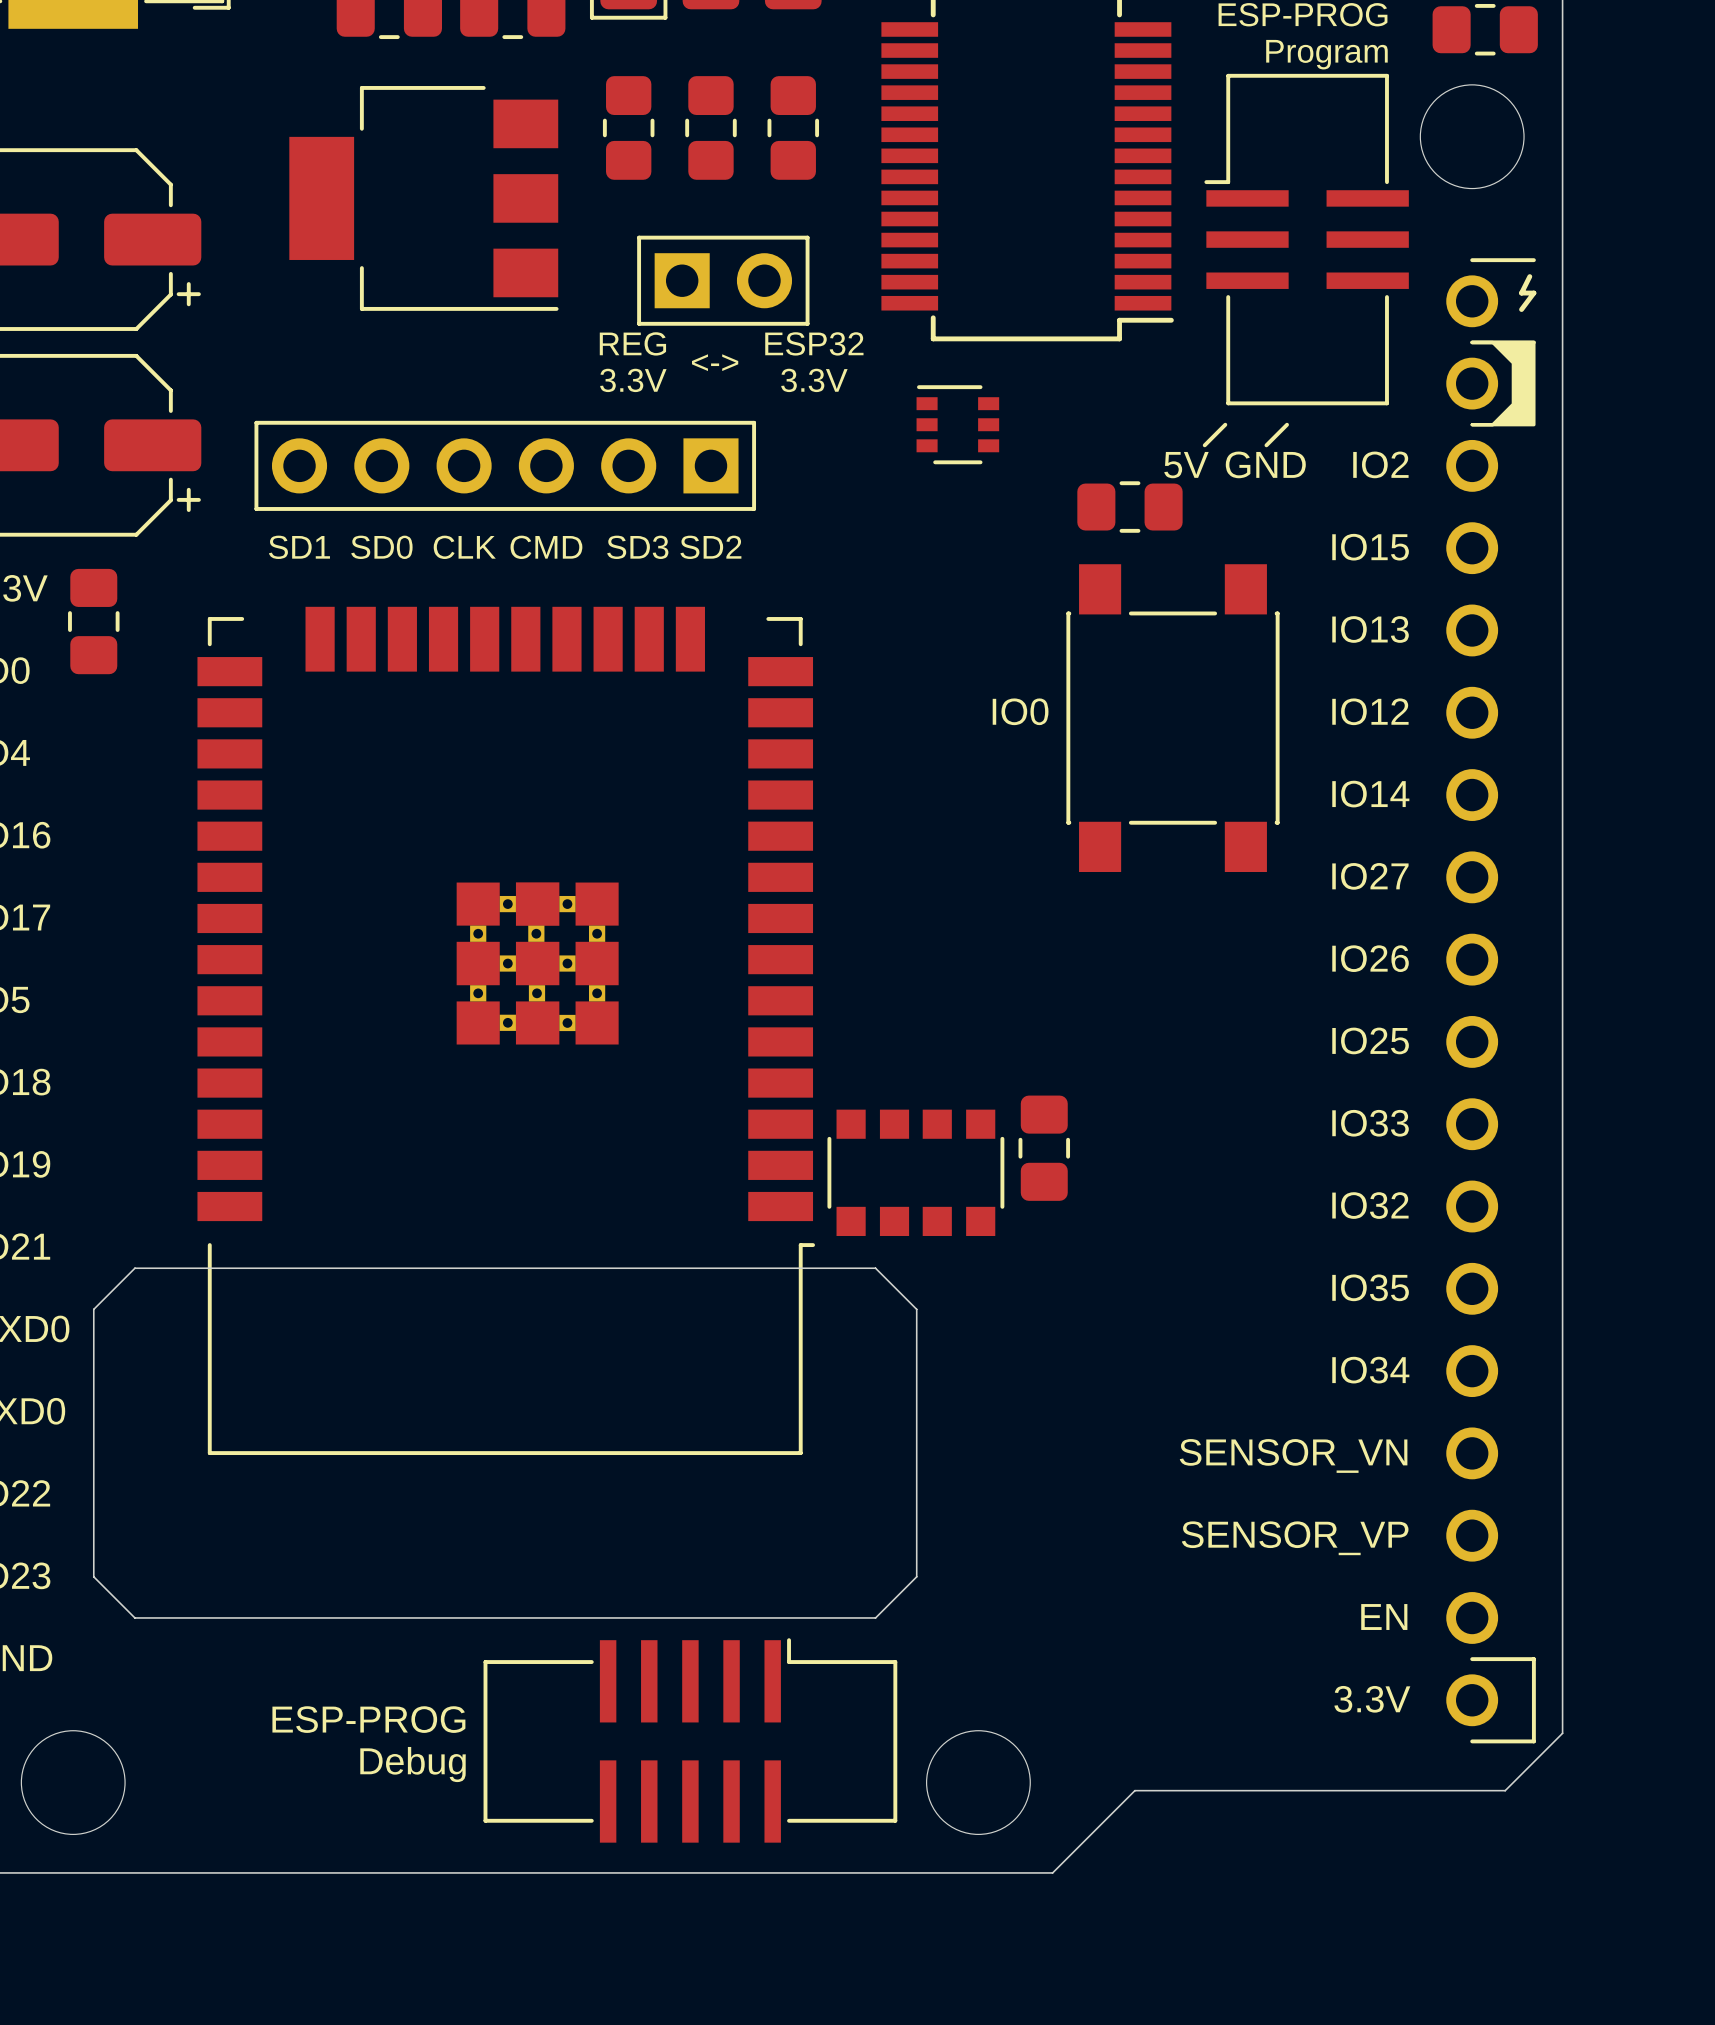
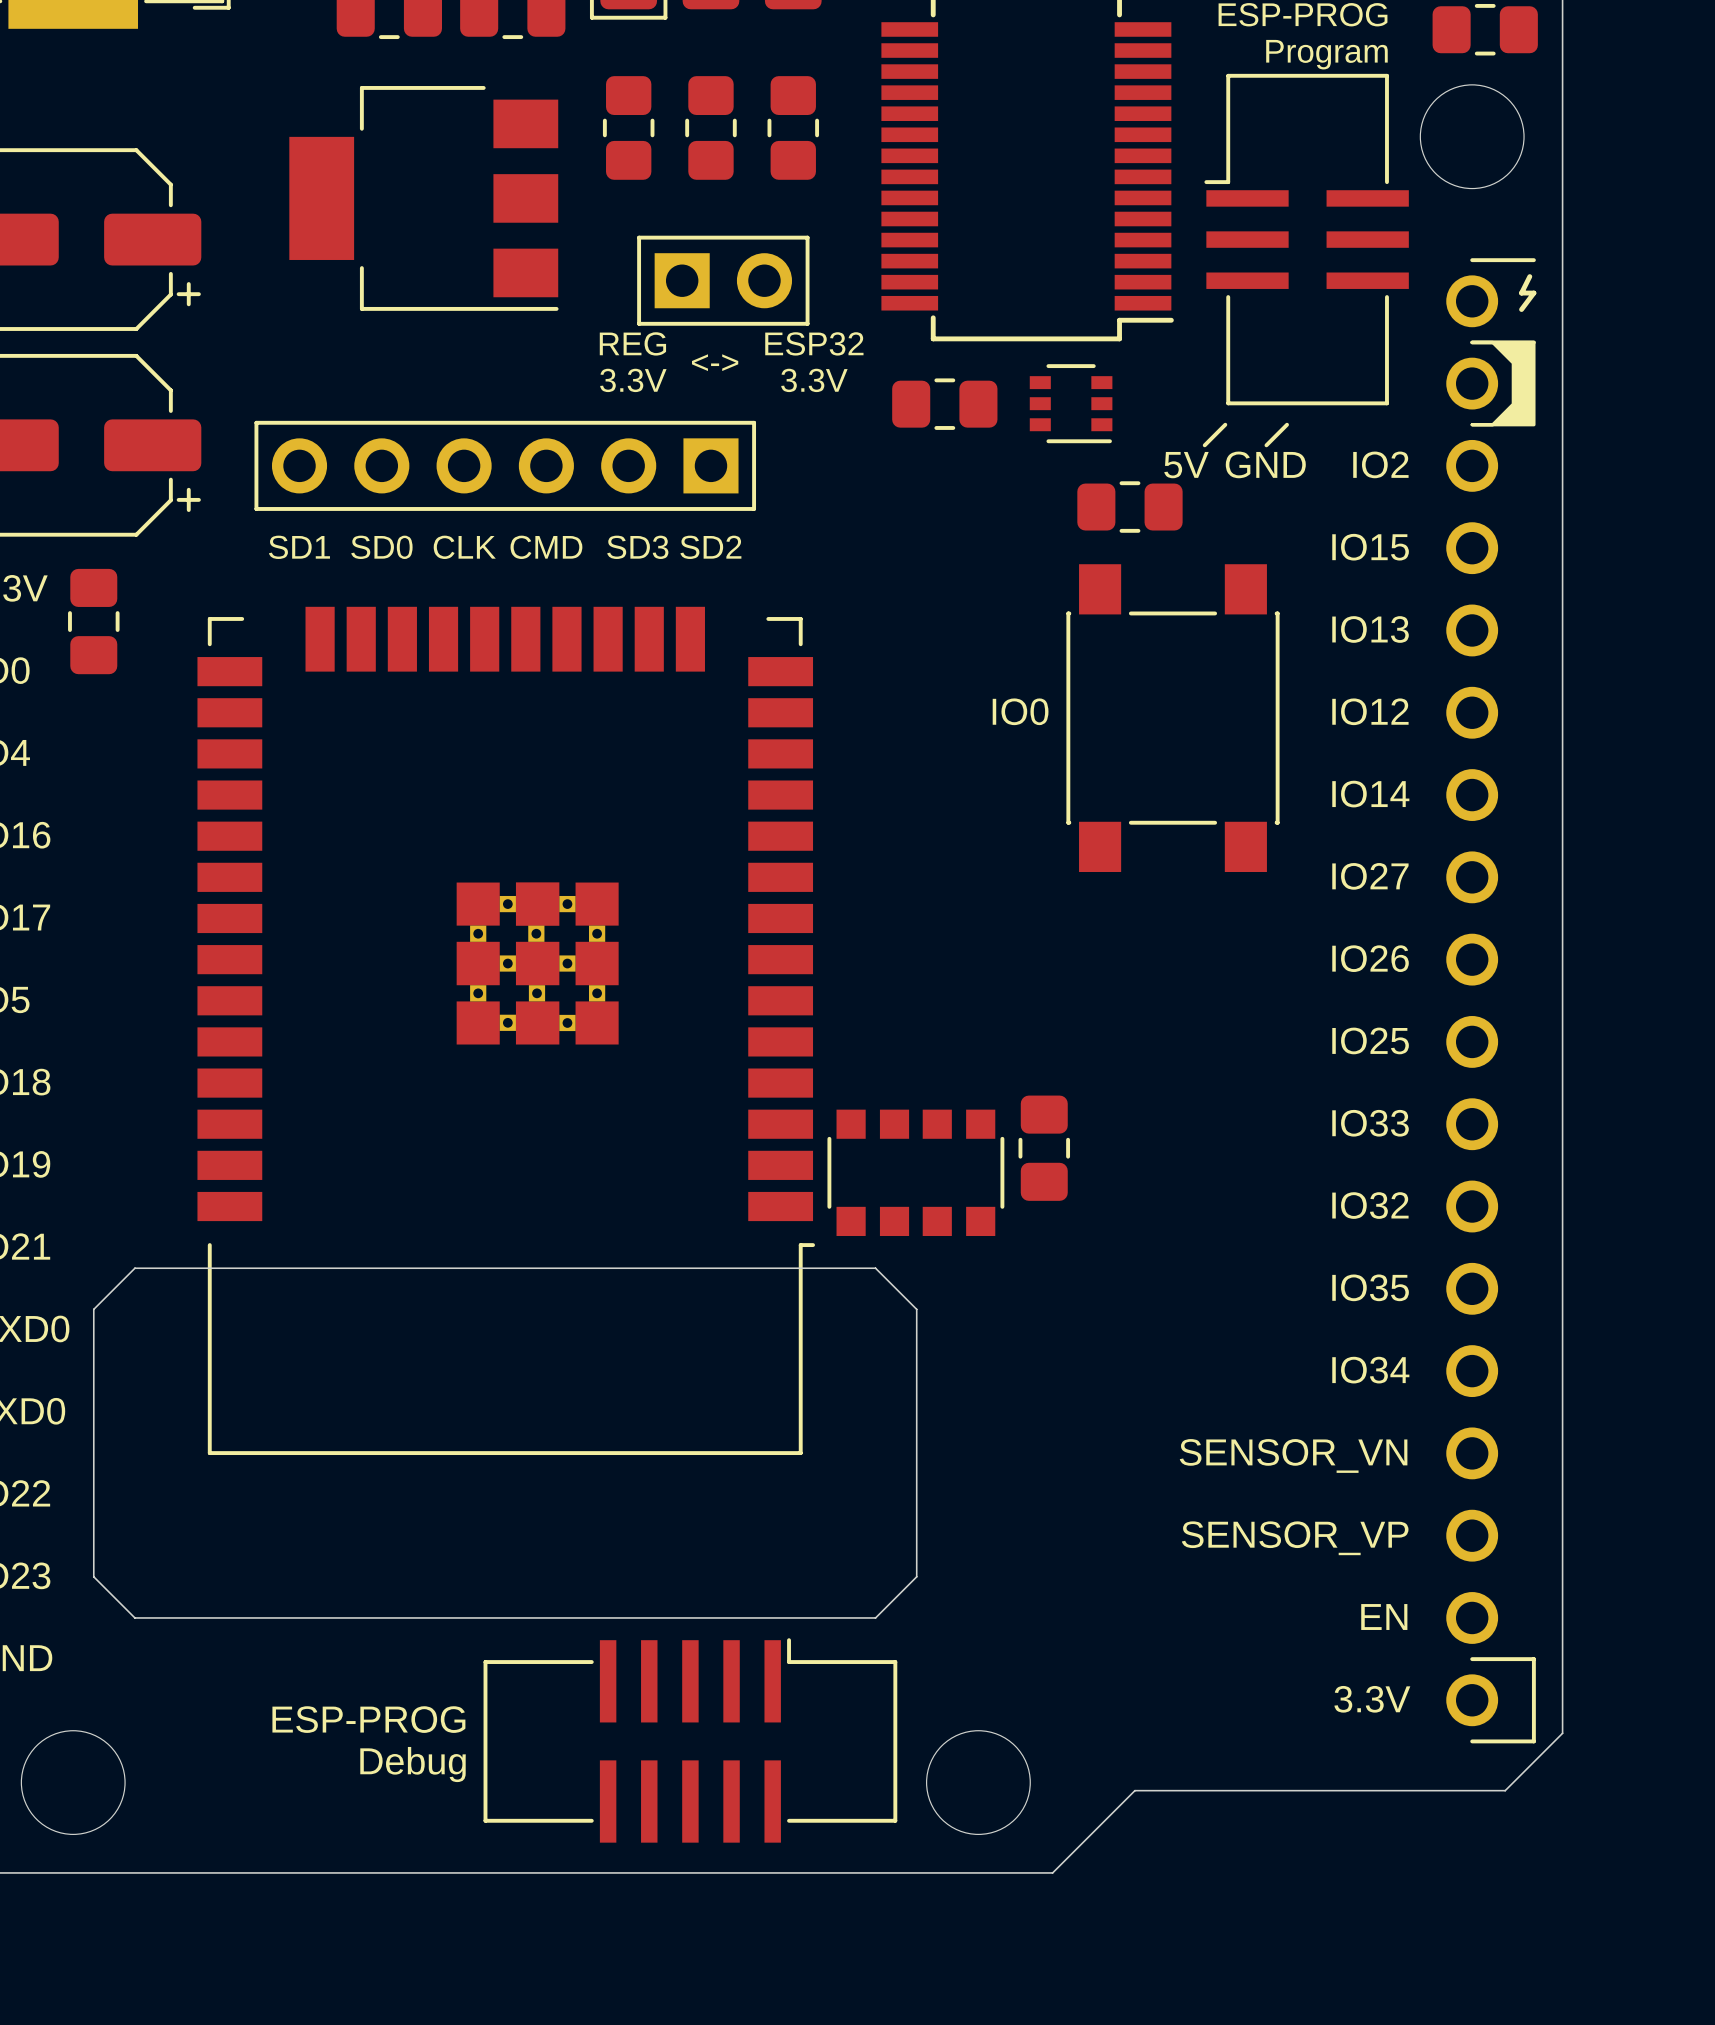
part footprint: [916, 385, 1000, 465] -> [892, 378, 998, 430]
part: none -> (1071, 403)

